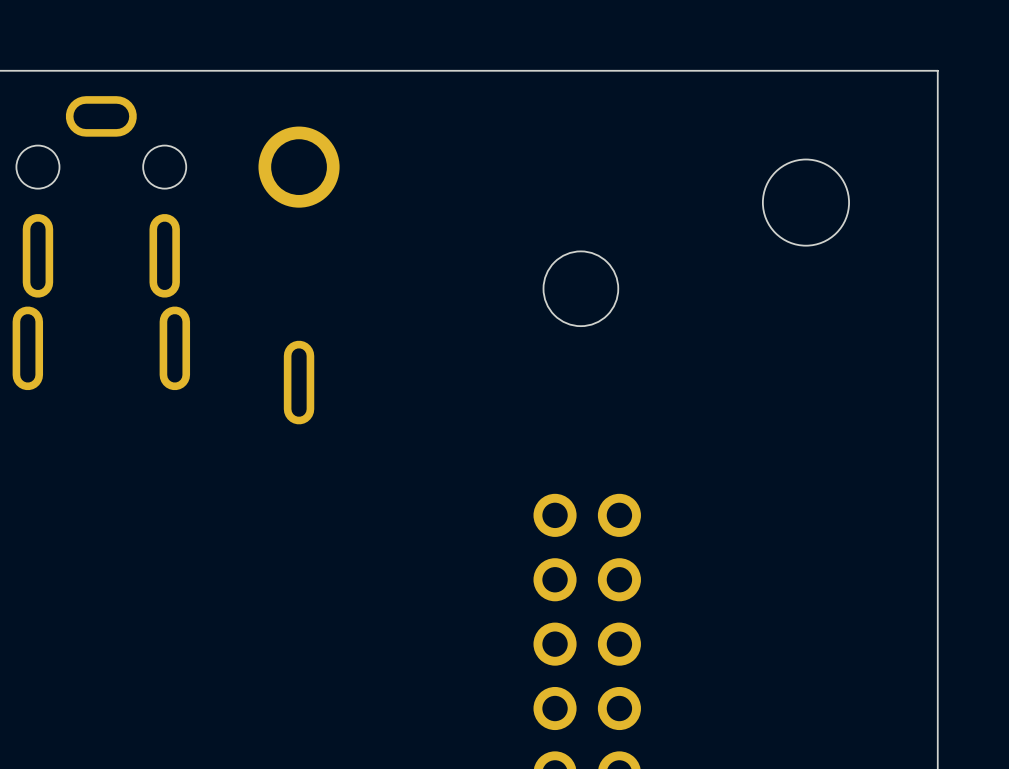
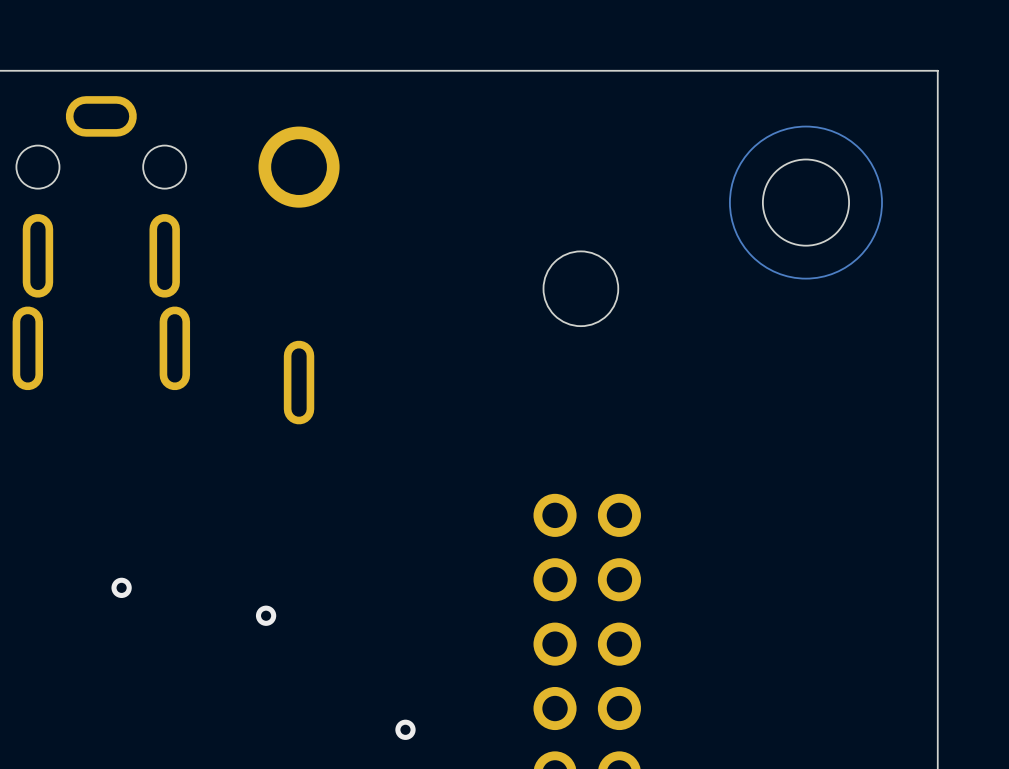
drawing: none -> [729, 126, 883, 279]
via: none -> (121, 587)
via: none -> (266, 615)
via: none -> (405, 729)

